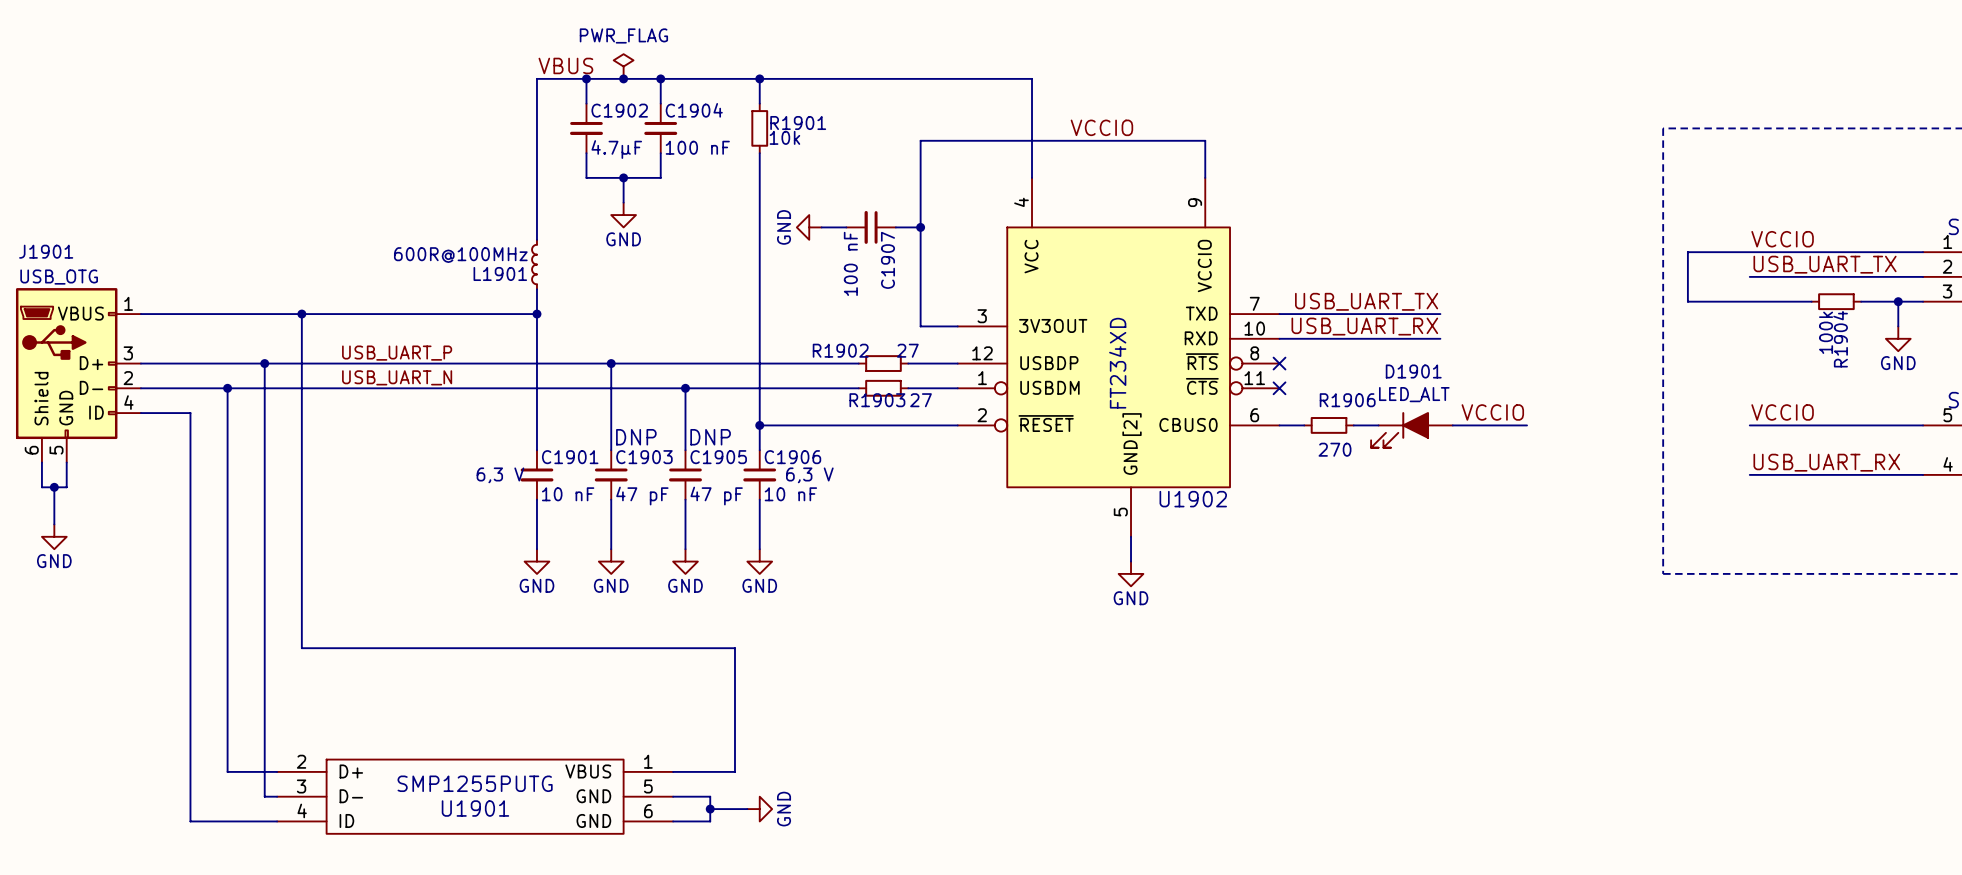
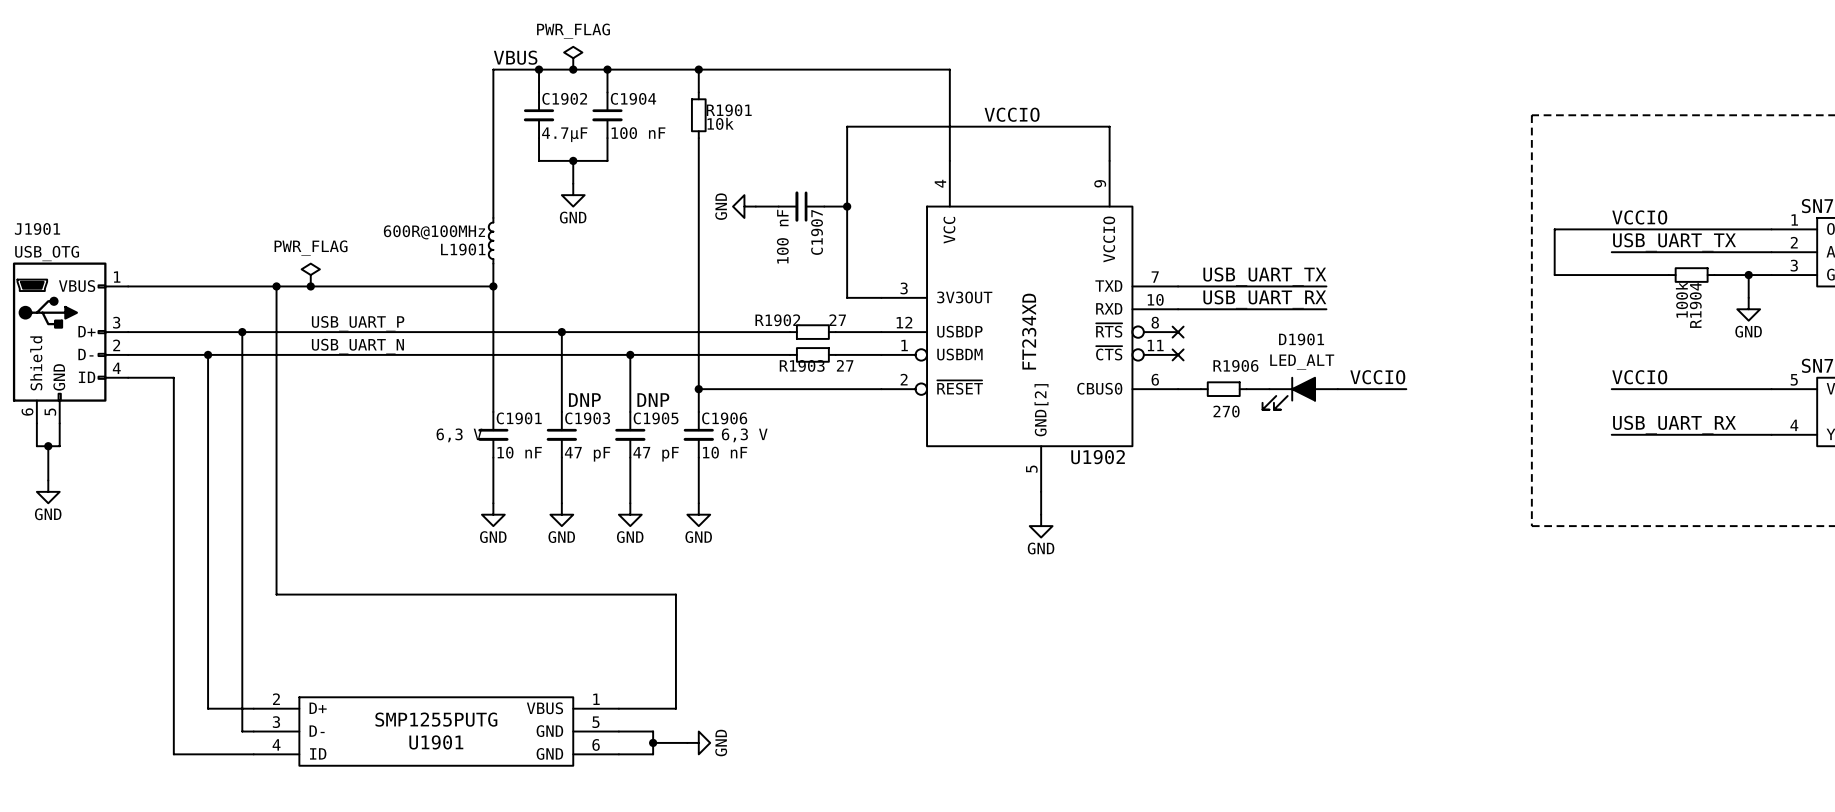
power symbol: none -> PWR_FLAG (310, 275)
junction: none -> (310, 286)

